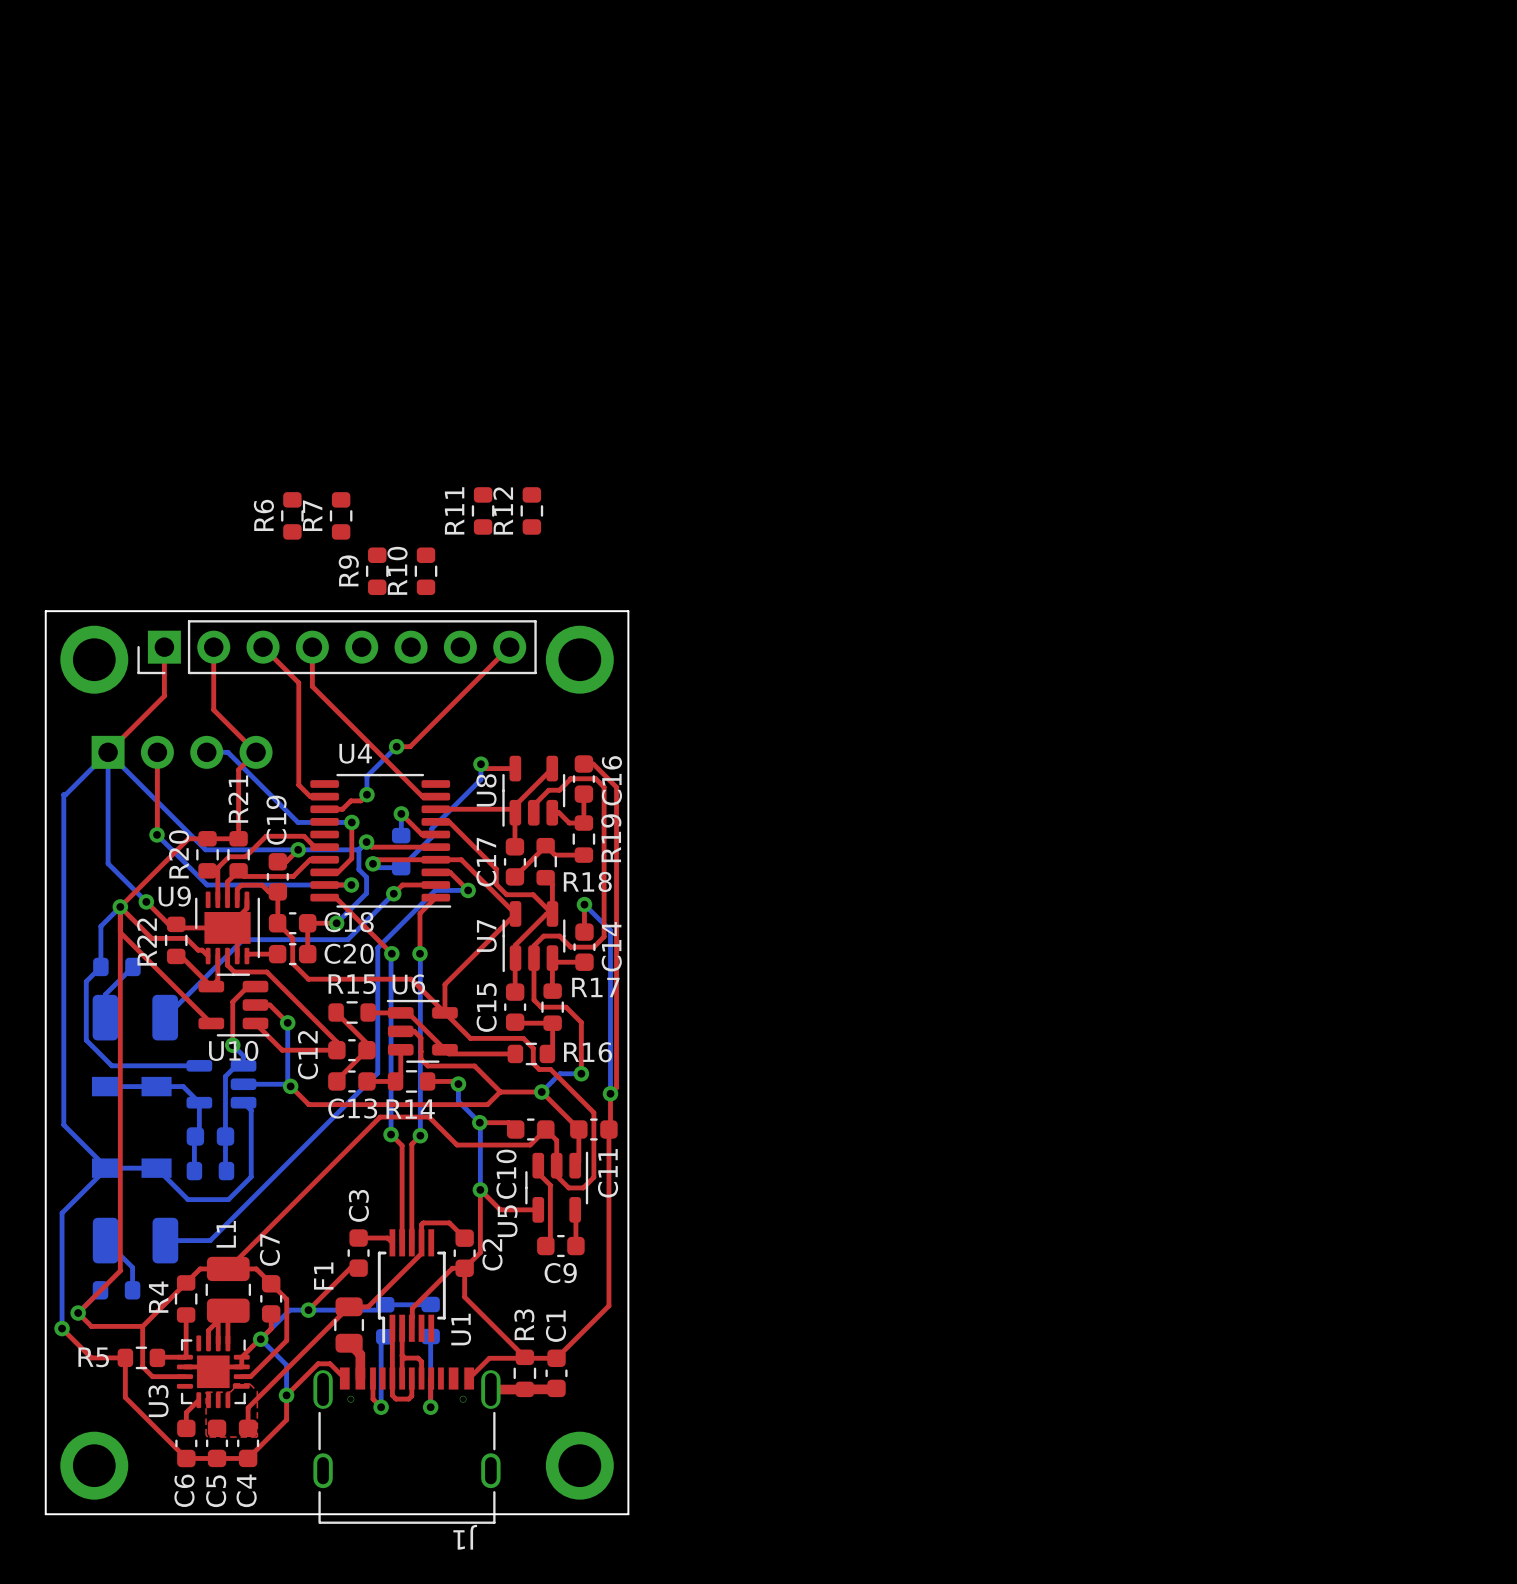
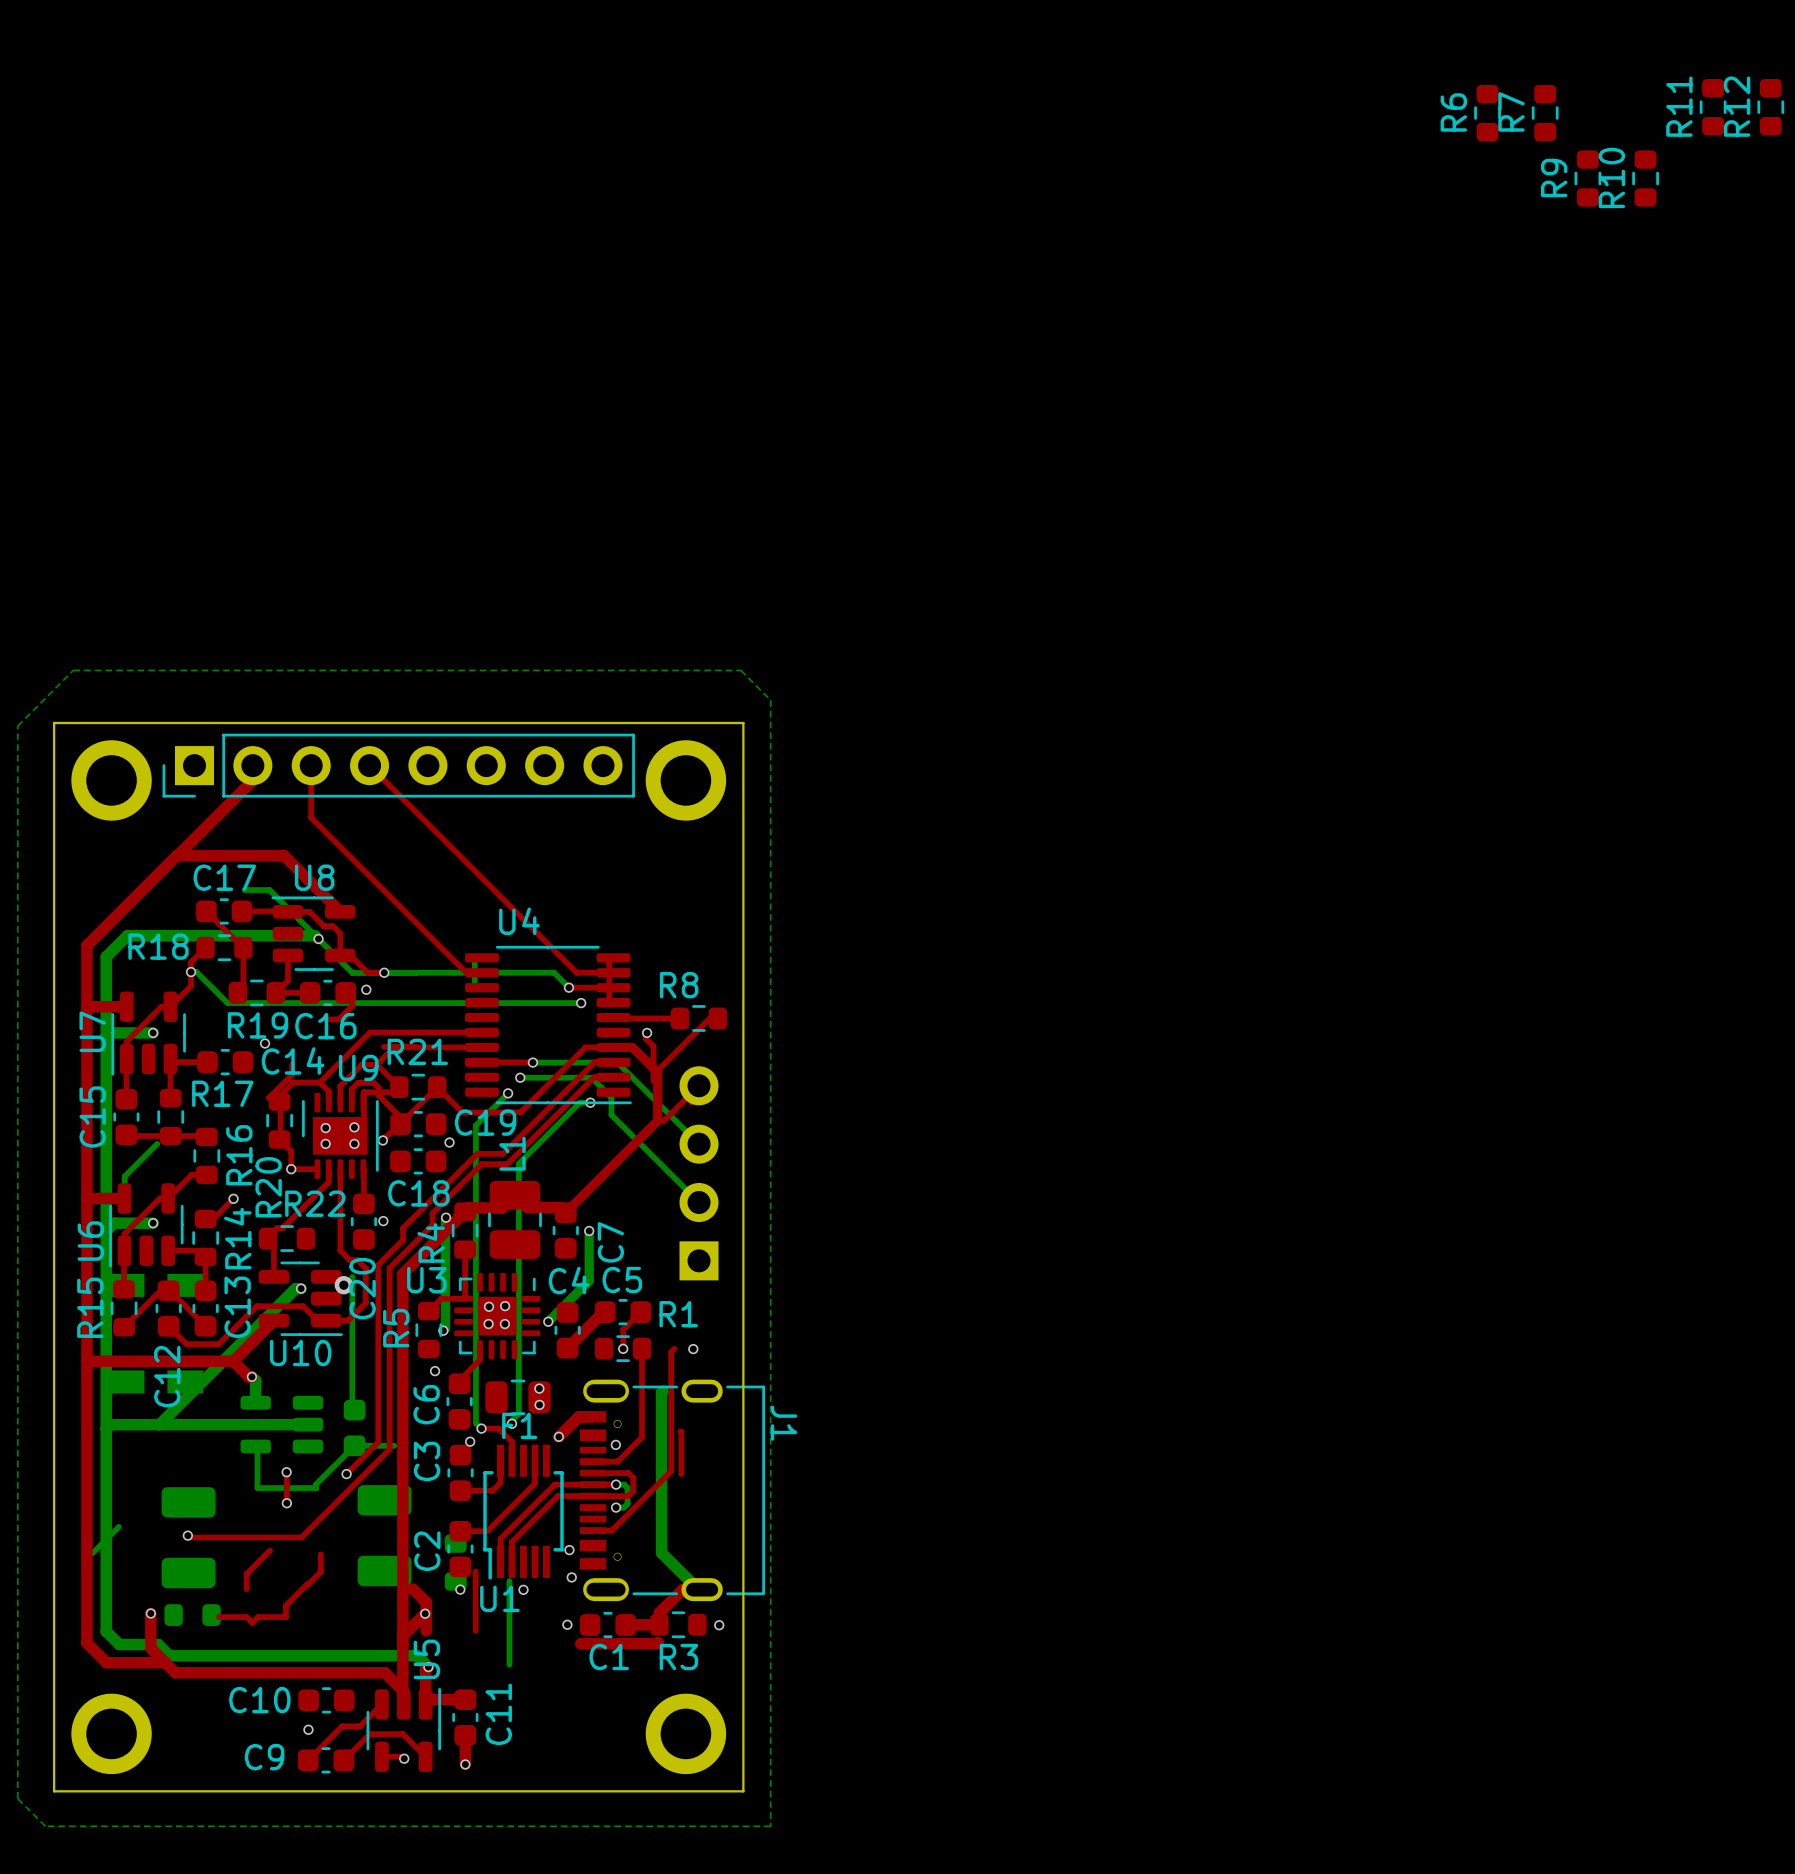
R11 position: (483, 510) -> (1713, 107)
R12 position: (531, 510) -> (1770, 107)
R6 position: (292, 515) -> (1487, 113)
R7 position: (341, 515) -> (1545, 113)
bottom zone outline: none -> (73, 670) (17, 725) (17, 1798) (45, 1826) (770, 1826) (770, 700) (740, 670) (73, 670)
R9 position: (377, 571) -> (1587, 178)
R10 position: (426, 571) -> (1645, 178)
top track: (164, 647) (164, 696) (108, 752) -> none
top track: (263, 647) (298, 682) (298, 785) (310, 796) (324, 796) -> (311, 765) (311, 817) (466, 972) (482, 972)
top track: (312, 647) (312, 686) (422, 796) (435, 796) -> (369, 765) (576, 972) (613, 972)
top track: (509, 647) (410, 746) (396, 746) -> none
top track: (213, 659) (213, 710) (256, 752) (238, 769) (238, 838) (188, 838) (120, 906) -> (252, 780) (177, 855)
bottom track: (396, 746) (366, 776) (366, 794) -> none
via: (396, 746) -> none
bottom track: (108, 752) (108, 863) (146, 901) -> none
bottom track: (108, 752) (205, 849) (358, 849) (366, 842) -> none
bottom track: (108, 752) (63, 794) (63, 1124) (107, 1168) -> none
top track: (157, 752) (157, 834) -> none
part rotation: 0° (182, 752) -> 90° counterclockwise (699, 1173)
part position: (182, 752) -> (699, 1173)
top track: (480, 764) (485, 768) (515, 768) -> none
bottom track: (480, 764) (480, 779) (431, 828) (431, 837) (401, 867) (376, 867) (372, 863) -> none
via: (480, 764) -> none
top track: (583, 764) (593, 764) (616, 787) (616, 1087) (610, 1093) (608, 1129) (608, 1305) (556, 1358) (489, 1358) (469, 1378) -> none
top track: (552, 768) (515, 805) (515, 812) (511, 809) (435, 809) -> none
top track: none -> (206, 911) (243, 947) (243, 987) (237, 992)
top track: none -> (242, 911) (309, 911) (323, 926) (333, 926) (340, 933) (340, 955) (350, 955) (367, 972) (384, 972)
top track: none -> (340, 911) (284, 855) (176, 855) (86, 945) (86, 1643) (106, 1662) (165, 1662)
C16 rotation: 0° (583, 779) -> 90° clockwise (327, 992)
C16 position: (583, 779) -> (327, 992)
bottom track: none -> (315, 935) (127, 935) (106, 956) (106, 1631) (119, 1644) (158, 1644) (169, 1655) (417, 1655) (428, 1667)
U8 rotation: 0° (533, 791) -> 90° clockwise (313, 933)
U8 position: (533, 791) -> (313, 933)
via: none -> (318, 938)
top track: (366, 794) (360, 800) (350, 800) (342, 809) (324, 809) -> none
via: (366, 794) -> none
top track: (583, 794) (583, 823) (569, 823) (559, 812) (552, 812) -> none
top track: none -> (205, 947) (191, 962) (191, 986) (170, 1006) (161, 1006) (126, 1041) (126, 1099)
top track: none -> (288, 955) (288, 980) (275, 992) (310, 992)
top track: (533, 812) (533, 805) (548, 790) (559, 790) (570, 778) (595, 778) (604, 787) (604, 936) (593, 947) (570, 947) (559, 936) (543, 936) (533, 945) (533, 1000) (541, 1007) (566, 1007) (581, 1022) (581, 1073) -> none
top track: (401, 813) (421, 834) (435, 834) -> none
via: (401, 813) -> none
bottom track: none -> (191, 972) (196, 972) (227, 1003) (581, 1003)
via: none -> (191, 972)
top track: (435, 821) (449, 821) (496, 869) (496, 884) (506, 894) (533, 894) (552, 913) (546, 913) (515, 945) (515, 992) -> none
bottom track: none -> (384, 972) (554, 972) (568, 987)
via: none -> (384, 972)
top track: (351, 822) (351, 858) (337, 872) (324, 872) -> none
via: (351, 822) -> none
bottom track: (157, 834) (207, 884) (351, 884) -> none
via: (157, 834) -> none
top track: none -> (568, 987) (613, 987)
via: none -> (568, 987)
via: none -> (366, 989)
R19 rotation: 0° (583, 839) -> 90° clockwise (256, 992)
R19 position: (583, 839) -> (256, 992)
U4 position: (380, 840) -> (548, 1025)
top track: (366, 842) (371, 847) (435, 847) -> none
via: (366, 842) -> none
top track: (324, 847) (314, 847) (304, 836) (266, 836) (245, 856) (229, 856) (214, 870) (207, 870) -> none
via: none -> (581, 1003)
via: (298, 849) -> none
bottom track: (358, 849) (358, 869) (366, 877) (366, 893) (336, 923) -> none
top track: none -> (86, 1006) (126, 1006)
R8 side: bottom (401, 851) -> top (698, 1018)
R20 name position: R20 (179, 854) -> R20 (268, 1187)
R20 position: (207, 854) -> (279, 1120)
R21 rotation: 0° (238, 854) -> 90° clockwise (418, 1087)
R21 position: (238, 854) -> (418, 1087)
top track: (583, 855) (555, 855) (545, 845) (514, 876) -> none
top track: (324, 859) (310, 859) (293, 876) (244, 876) (238, 870) (227, 881) (227, 899) -> none
top track: none -> (613, 1017) (679, 1018)
top track: none -> (717, 1018) (709, 1018) (657, 1072)
C17 rotation: 0° (514, 861) -> 90° clockwise (224, 911)
C17 position: (514, 861) -> (224, 911)
R18 rotation: 0° (545, 861) -> 90° clockwise (224, 947)
R18 position: (545, 861) -> (224, 947)
top track: (372, 863) (377, 859) (461, 859) (515, 913) (444, 984) (444, 1012) -> none
via: (372, 863) -> none
top track: (217, 867) (217, 899) -> none
top track: none -> (482, 1032) (370, 1032) (319, 1082)
top track: (435, 872) (450, 872) (468, 890) -> none
bottom track: none -> (153, 1032) (109, 1032) (106, 1035)
via: none -> (153, 1032)
via: none -> (647, 1032)
C19 rotation: 0° (277, 876) -> 90° clockwise (418, 1124)
C19 position: (277, 876) -> (418, 1124)
R18 name position: R18 (587, 881) -> R18 (158, 946)
via: none -> (265, 1043)
via: (351, 884) -> none
top track: (435, 884) (402, 884) (393, 893) -> none
top track: none -> (482, 1047) (394, 1047) (376, 1064)
bottom track: (468, 890) (435, 890) (377, 947) (377, 1073) (210, 1240) (165, 1240) -> none
via: (468, 890) -> none
bottom track: (393, 893) (347, 939) (243, 939) (165, 1017) -> none
via: (393, 893) -> none
U9 name position: U9 (174, 896) -> U9 (358, 1067)
top track: none -> (207, 1062) (173, 1062) (170, 1059) (170, 1097)
top track: (324, 897) (335, 897) (391, 953) -> none
top track: (435, 897) (419, 913) (419, 953) -> none
top track: none -> (482, 1062) (532, 1062)
bottom track: none -> (532, 1062) (617, 1062) (699, 1144)
via: none -> (532, 1062)
top track: none -> (613, 1062) (594, 1062) (503, 1153) (477, 1153) (403, 1228) (403, 1240) (378, 1264) (378, 1442) (346, 1474)
top track: (237, 899) (237, 889) (241, 885) (262, 885) (268, 891) (277, 891) (277, 923) -> none
top track: none -> (376, 1064) (361, 1064) (340, 1086) (340, 1102)
top track: none -> (376, 1064) (399, 1087)
top track: (146, 901) (168, 924) (176, 924) (179, 927) (227, 927) -> none
via: (146, 901) -> none
bottom track: (584, 904) (610, 930) (610, 1093) -> none
via: (584, 904) -> none
top track: (120, 906) (120, 1270) (78, 1313) (91, 1326) (142, 1326) -> none
top track: (120, 906) (151, 938) (186, 938) (198, 950) (202, 950) (208, 956) -> none
bottom track: (120, 906) (100, 926) (100, 966) (86, 981) (86, 1040) (111, 1065) (199, 1065) -> none
via: (120, 906) -> none
top track: none -> (657, 1072) (632, 1047) (585, 1047) (520, 1112) (462, 1112) (437, 1087) (400, 1123)
top track: none -> (657, 1072) (657, 1120)
top track: none -> (613, 1077) (594, 1077) (507, 1164) (481, 1164) (432, 1213) (432, 1225) (389, 1268) (389, 1449) (301, 1537) (189, 1537) (187, 1535)
bottom track: none -> (520, 1077) (591, 1077) (611, 1097) (611, 1114) (699, 1202)
via: none -> (520, 1077)
top track: none -> (319, 1082) (328, 1091) (328, 1102)
top track: none -> (319, 1082) (293, 1082) (279, 1096) (279, 1101)
top track: none -> (699, 1085) (663, 1120) (657, 1120)
C18 name position: C18 (349, 922) -> C18 (418, 1193)
top track: (277, 923) (292, 938) (292, 963) (308, 979) (411, 979) (470, 1038) (523, 1038) (533, 1048) (533, 1063) (539, 1069) (550, 1069) (593, 1112) (593, 1177) (583, 1187) (568, 1187) (556, 1175) (556, 1140) (545, 1129) (530, 1145) (457, 1145) (429, 1117) (380, 1117) (228, 1268) -> none
C18 position: (292, 923) -> (418, 1161)
via: (336, 923) -> none
bottom track: none -> (508, 1093) (475, 1125) (475, 1423) (481, 1428)
via: none -> (508, 1093)
U9 position: (227, 927) -> (340, 1135)
top track: (120, 932) (211, 1023) -> none
top track: none -> (351, 1102) (351, 1089) (358, 1082) (373, 1082) (378, 1087) (378, 1095) (400, 1117) (400, 1124) (382, 1140)
bottom track: none -> (590, 1102) (579, 1102) (518, 1163) (518, 1413) (512, 1420) (512, 1423)
via: none -> (590, 1102)
U7 position: (533, 936) -> (148, 1033)
R22 rotation: 0° (176, 940) -> 90° clockwise (287, 1238)
R22 position: (176, 940) -> (287, 1238)
top track: none -> (657, 1120) (565, 1212) (560, 1207) (527, 1207) (514, 1195) (502, 1208) (468, 1208) (402, 1273) (402, 1703) (403, 1704) (403, 1691) (384, 1672) (175, 1672) (150, 1648) (150, 1613)
C14 rotation: 0° (584, 947) -> 90° clockwise (225, 1062)
C14 position: (584, 947) -> (225, 1062)
via: none -> (354, 1127)
via: none -> (325, 1128)
bottom track: (391, 953) (391, 1134) -> none
via position: (391, 953) -> (449, 1142)
bottom track: (419, 953) (420, 1135) -> none
via: (419, 953) -> none
top track: (277, 954) (248, 954) (246, 956) -> none
C20 rotation: 0° (292, 954) -> 90° clockwise (363, 1221)
C20 position: (292, 954) -> (363, 1221)
top track: (217, 956) (217, 980) (211, 986) (181, 956) (176, 956) -> none
top track: (227, 956) (227, 965) (234, 972) (266, 972) (336, 1042) (336, 1050) (282, 1050) (255, 1023) -> none
top track: none -> (126, 1134) (206, 1137)
top track: (584, 962) (556, 962) (552, 958) (552, 990) -> none
top track: none -> (279, 1139) (291, 1151) (291, 1169) (317, 1169)
via: none -> (382, 1140)
part: (116, 966) -> none
via: none -> (325, 1143)
via: none -> (354, 1143)
R15 name position: R15 (352, 984) -> R15 (90, 1307)
top track: (255, 986) (248, 986) (232, 1001) (232, 1045) -> none
via: none -> (291, 1169)
top track: none -> (328, 1169) (328, 1182) (282, 1228) (276, 1228) (268, 1237) (273, 1244) (273, 1276)
top track: none -> (340, 1169) (340, 1250) (350, 1260) (357, 1260) (365, 1268) (365, 1302) (348, 1320) (317, 1320) (303, 1306) (256, 1306) (218, 1344) (186, 1344) (168, 1326)
top track: none -> (363, 1169) (363, 1203)
top track: none -> (206, 1174) (191, 1174) (168, 1198) (159, 1198) (124, 1233) (124, 1289)
U10 position: (233, 1005) -> (300, 1298)
top track: (255, 1005) (269, 1005) (287, 1022) -> none
C15 position: (515, 1007) -> (126, 1117)
R17 position: (552, 1007) -> (170, 1117)
top track: none -> (86, 1198) (124, 1198)
top track: (336, 1012) (366, 1043) (366, 1050) (336, 1081) -> none
R15 rotation: 0° (352, 1012) -> 90° clockwise (124, 1308)
R15 position: (352, 1012) -> (124, 1308)
top track: (368, 1012) (408, 1012) (444, 1049) -> none
top track: none -> (233, 1198) (213, 1219) (205, 1219)
via: none -> (233, 1198)
part: (135, 1017) -> none
bottom track: (287, 1022) (287, 1083) (290, 1086) -> none
via: (287, 1022) -> none
top track: (515, 1022) (552, 1023) (552, 1048) (547, 1053) -> none
bottom track: none -> (446, 1217) (445, 1328) (443, 1330)
via: none -> (446, 1217)
top track: (400, 1031) (414, 1031) (420, 1038) (420, 1059) (427, 1066) (474, 1066) (500, 1092) -> none
U6 rotation: 0° (422, 1031) -> 90° counterclockwise (146, 1225)
U6 position: (422, 1031) -> (146, 1225)
via: none -> (383, 1221)
bottom track: none -> (153, 1223) (114, 1223) (106, 1230)
via: none -> (153, 1223)
bottom track: none -> (589, 1230) (589, 1280) (548, 1321)
via: none -> (589, 1230)
bottom track: (232, 1045) (243, 1055) (243, 1065) (236, 1065) (225, 1076) (226, 1171) -> none
via: (232, 1045) -> none
top track: (400, 1049) (400, 1076) (395, 1081) (366, 1081) -> none
top track: (444, 1049) (449, 1053) (515, 1053) -> none
C12 rotation: 0° (351, 1050) -> 90° clockwise (168, 1308)
C12 position: (351, 1050) -> (168, 1308)
R16 rotation: 0° (531, 1053) -> 90° clockwise (206, 1155)
R16 position: (531, 1053) -> (206, 1155)
C12 name position: C12 (308, 1055) -> C12 (167, 1376)
top track: none -> (465, 1249) (465, 1297) (441, 1298) (428, 1311)
top track: none -> (168, 1250) (199, 1250) (205, 1256) (205, 1290)
bottom track: (581, 1073) (560, 1073) (541, 1092) -> none
via: (581, 1073) -> none
bottom track: none -> (352, 1276) (352, 1407)
C13 rotation: 0° (351, 1081) -> 90° clockwise (205, 1308)
C13 position: (351, 1081) -> (205, 1308)
R14 rotation: 0° (411, 1081) -> 90° clockwise (205, 1237)
R14 position: (411, 1081) -> (205, 1237)
top track: (427, 1081) (455, 1081) (458, 1084) -> none
part position: (221, 1084) -> (281, 1424)
bottom track: (243, 1084) (288, 1084) -> none
bottom track: (458, 1084) (458, 1101) (480, 1123) (480, 1189) -> none
via: (458, 1084) -> none
bottom track: (107, 1086) (183, 1086) (199, 1102) (199, 1132) (194, 1137) (194, 1171) -> none
top track: (290, 1086) (308, 1104) (487, 1104) (500, 1091) -> none
bottom track: none -> (301, 1288) (295, 1288) (159, 1424)
via: none -> (301, 1288)
top track: (500, 1092) (541, 1092) (578, 1129) (578, 1161) (575, 1165) -> none
via: (541, 1092) -> none
via: (610, 1093) -> none
bottom track: (243, 1102) (251, 1110) (251, 1176) (228, 1199) (188, 1199) (156, 1168) (107, 1168) -> none
via: none -> (489, 1306)
via: none -> (505, 1306)
C13 name position: C13 (352, 1108) -> C13 (237, 1307)
R14 name position: R14 (410, 1109) -> R14 (237, 1238)
top track: none -> (605, 1312) (567, 1348)
top track: none -> (640, 1312) (623, 1329) (623, 1348)
top track: none -> (273, 1320) (233, 1361)
via: none -> (548, 1321)
via: none -> (488, 1324)
via: none -> (504, 1324)
top track: none -> (205, 1326) (170, 1290) (160, 1290) (124, 1327)
top track: (479, 1122) (508, 1122) (515, 1129) -> none
via: (479, 1122) -> none
via: none -> (443, 1330)
C10 position: (530, 1129) -> (326, 1700)
C11 rotation: 0° (593, 1129) -> 90° clockwise (465, 1717)
C11 position: (593, 1129) -> (465, 1717)
top track: (391, 1134) (402, 1145) (402, 1242) -> none
via: (391, 1134) -> none
top track: (420, 1135) (411, 1144) (411, 1242) -> none
via: (420, 1135) -> none
part rotation: 0° (210, 1136) -> 90° clockwise (354, 1427)
part position: (210, 1136) -> (354, 1427)
top track: none -> (642, 1348) (642, 1437) (617, 1461) (593, 1461)
top track: none -> (480, 1349) (480, 1359) (459, 1380) (459, 1383)
via: none -> (623, 1348)
top track: none -> (674, 1348) (671, 1352) (671, 1471) (611, 1530) (593, 1530)
via: none -> (693, 1349)
top track: none -> (86, 1361) (233, 1361)
top track: none -> (233, 1361) (248, 1376) (251, 1376)
via: none -> (435, 1371)
bottom track: none -> (251, 1376) (255, 1380) (255, 1402)
via: none -> (251, 1376)
top track: (538, 1165) (538, 1173) (550, 1185) (550, 1241) (545, 1246) -> none
bottom track: (107, 1168) (62, 1213) (62, 1328) -> none
part: (210, 1171) -> none
via: none -> (539, 1388)
C11 name position: C11 (608, 1173) -> C11 (498, 1714)
C10 name rotation: 0° (506, 1174) -> 90° clockwise (259, 1700)
bottom track: none -> (663, 1391) (661, 1392) (661, 1552) (698, 1589) (702, 1589)
via: none -> (539, 1404)
U5 position: (556, 1187) -> (403, 1729)
via: (480, 1189) -> none
top track: none -> (593, 1416) (578, 1416) (558, 1436)
via: none -> (512, 1423)
bottom track: none -> (307, 1424) (110, 1424) (106, 1428)
C3 name position: C3 (358, 1205) -> C3 (427, 1461)
top track: none -> (481, 1428) (498, 1428) (512, 1441) (512, 1460)
via: none -> (481, 1428)
top track: (538, 1209) (500, 1209) (480, 1189) (480, 1252) (464, 1268) -> none
via: none -> (558, 1436)
via: none -> (470, 1441)
U5 name position: U5 (507, 1221) -> U5 (426, 1659)
via: none -> (615, 1444)
bottom track: none -> (394, 1445) (354, 1445) (316, 1484) (316, 1488) (257, 1488) (257, 1448) (255, 1446)
top track: none -> (500, 1460) (500, 1482) (492, 1490) (460, 1490)
top track: none -> (534, 1460) (534, 1483) (487, 1531) (460, 1531)
top track: (358, 1238) (387, 1238) (392, 1242) -> none
top track: (464, 1238) (449, 1222) (423, 1222) (421, 1224) (421, 1253) (368, 1306) (349, 1306) (248, 1407) (248, 1428) -> none
bottom track: (105, 1240) (132, 1267) (132, 1290) -> none
part rotation: 0° (135, 1240) -> 90° clockwise (188, 1537)
part position: (135, 1240) -> (188, 1537)
top track: none -> (286, 1472) (286, 1503)
via: none -> (286, 1472)
top track: none -> (593, 1473) (628, 1473) (633, 1477) (633, 1491) (628, 1496) (557, 1496) (512, 1541) (512, 1561)
via: none -> (346, 1474)
C9 position: (560, 1246) -> (326, 1760)
C7 name position: C7 (269, 1250) -> C7 (610, 1242)
C3 position: (358, 1253) -> (460, 1472)
C2 position: (464, 1253) -> (460, 1549)
C2 name position: C2 (492, 1254) -> C2 (427, 1551)
top track: none -> (616, 1484) (554, 1484) (500, 1538) (500, 1561)
bottom track: none -> (616, 1484) (624, 1484) (627, 1487) (627, 1503) (623, 1507) (616, 1507)
via: none -> (616, 1484)
top track: (358, 1268) (350, 1268) (308, 1310) -> none
top track: (464, 1268) (464, 1297) (524, 1357) -> none
top track: (464, 1268) (452, 1268) (412, 1308) (411, 1328) -> none
via: none -> (286, 1503)
C9 name position: C9 (560, 1273) -> C9 (264, 1757)
via: none -> (616, 1507)
F1 name position: F1 (323, 1276) -> F1 (519, 1425)
U1 position: (411, 1286) -> (523, 1512)
L1 position: (228, 1289) -> (514, 1219)
part position: (116, 1290) -> (192, 1615)
R4 name position: R4 (158, 1297) -> R4 (431, 1242)
via: none -> (187, 1535)
R4 position: (186, 1298) -> (465, 1230)
C7 position: (271, 1298) -> (565, 1230)
part: none -> (384, 1535)
bottom track: (430, 1304) (385, 1304) (379, 1310) (289, 1310) (260, 1339) (286, 1365) (286, 1395) -> none
via: (308, 1310) -> none
via: none -> (569, 1550)
top track: (227, 1311) (227, 1343) -> none
via: (78, 1313) -> none
top track: (186, 1314) (186, 1356) (157, 1357) -> none
top track: (218, 1320) (218, 1343) -> none
R1 side: bottom (430, 1320) -> top (623, 1348)
R3 name position: R3 (524, 1324) -> R3 (678, 1657)
F1 rotation: 0° (349, 1325) -> 90° clockwise (518, 1397)
F1 position: (349, 1325) -> (518, 1397)
top track: (142, 1326) (200, 1268) (256, 1268) (286, 1299) (286, 1340) (250, 1376) (241, 1376) -> none
top track: (142, 1326) (142, 1366) (152, 1376) (184, 1376) -> none
C1 name position: C1 (556, 1326) -> C1 (609, 1657)
top track: (62, 1328) (91, 1357) (125, 1357) (125, 1397) (186, 1458) (248, 1458) (286, 1419) (286, 1395) (318, 1363) (330, 1363) (344, 1378) -> none
via: (62, 1328) -> none
top track: (392, 1328) (392, 1395) (396, 1399) (408, 1399) (411, 1395) (411, 1378) -> none
U1 name rotation: 0° (461, 1329) -> 90° clockwise (499, 1598)
via: none -> (571, 1577)
bottom track: (385, 1336) (381, 1340) (381, 1407) -> none
via: (260, 1339) -> none
via: none -> (460, 1589)
via: none -> (523, 1589)
top track: none -> (702, 1589) (682, 1589) (659, 1612) (659, 1624) (625, 1624)
top track: (402, 1355) (404, 1358) (417, 1358) (421, 1361) (421, 1378) -> none
R5 rotation: 0° (141, 1357) -> 90° clockwise (428, 1330)
R5 position: (141, 1357) -> (428, 1330)
via: none -> (150, 1613)
top track: none -> (425, 1613) (402, 1636)
via: none -> (425, 1613)
U3 position: (213, 1371) -> (497, 1315)
via: none -> (567, 1624)
R3 rotation: 0° (524, 1373) -> 90° clockwise (678, 1624)
R3 position: (524, 1373) -> (678, 1624)
C1 rotation: 0° (556, 1373) -> 90° clockwise (607, 1625)
C1 position: (556, 1373) -> (607, 1625)
via: none -> (719, 1625)
top track: (372, 1378) (372, 1399) (381, 1407) -> none
top track: (431, 1378) (430, 1407) -> none
top zone outline: (233, 1383) (233, 1388) (230, 1392) (206, 1392) (206, 1435) (207, 1437) (257, 1437) (257, 1391) (249, 1383) (233, 1383) -> none
via: (286, 1395) -> none
top track: (198, 1400) (186, 1412) (186, 1428) -> none
U3 name rotation: 0° (158, 1401) -> 90° clockwise (426, 1280)
U3 name position: U3 (158, 1401) -> U3 (426, 1280)
via: (381, 1407) -> none
via: (430, 1407) -> none
top track: none -> (428, 1667) (425, 1669) (425, 1704) (430, 1699) (465, 1699)
via: none -> (428, 1667)
top track: none -> (381, 1704) (360, 1726) (342, 1726) (308, 1760)
C6 position: (186, 1443) -> (459, 1401)
C5 rotation: 0° (217, 1443) -> 90° clockwise (623, 1312)
C5 position: (217, 1443) -> (623, 1312)
C4 position: (248, 1443) -> (567, 1330)
J1 rotation: 0° (406, 1445) -> 90° counterclockwise (672, 1490)
J1 position: (406, 1445) -> (672, 1490)
via: none -> (308, 1729)
top track: none -> (465, 1735) (465, 1764)
top track: none -> (381, 1756) (402, 1756) (404, 1758)
top track: none -> (425, 1756) (402, 1734) (370, 1734) (343, 1760)
via: none -> (404, 1758)
C6 name position: C6 (184, 1490) -> C6 (426, 1404)
C4 name rotation: 0° (246, 1490) -> 90° clockwise (569, 1280)
C4 name position: C4 (246, 1490) -> C4 (569, 1280)
C5 name position: C5 (216, 1491) -> C5 (622, 1279)
via: none -> (465, 1764)

